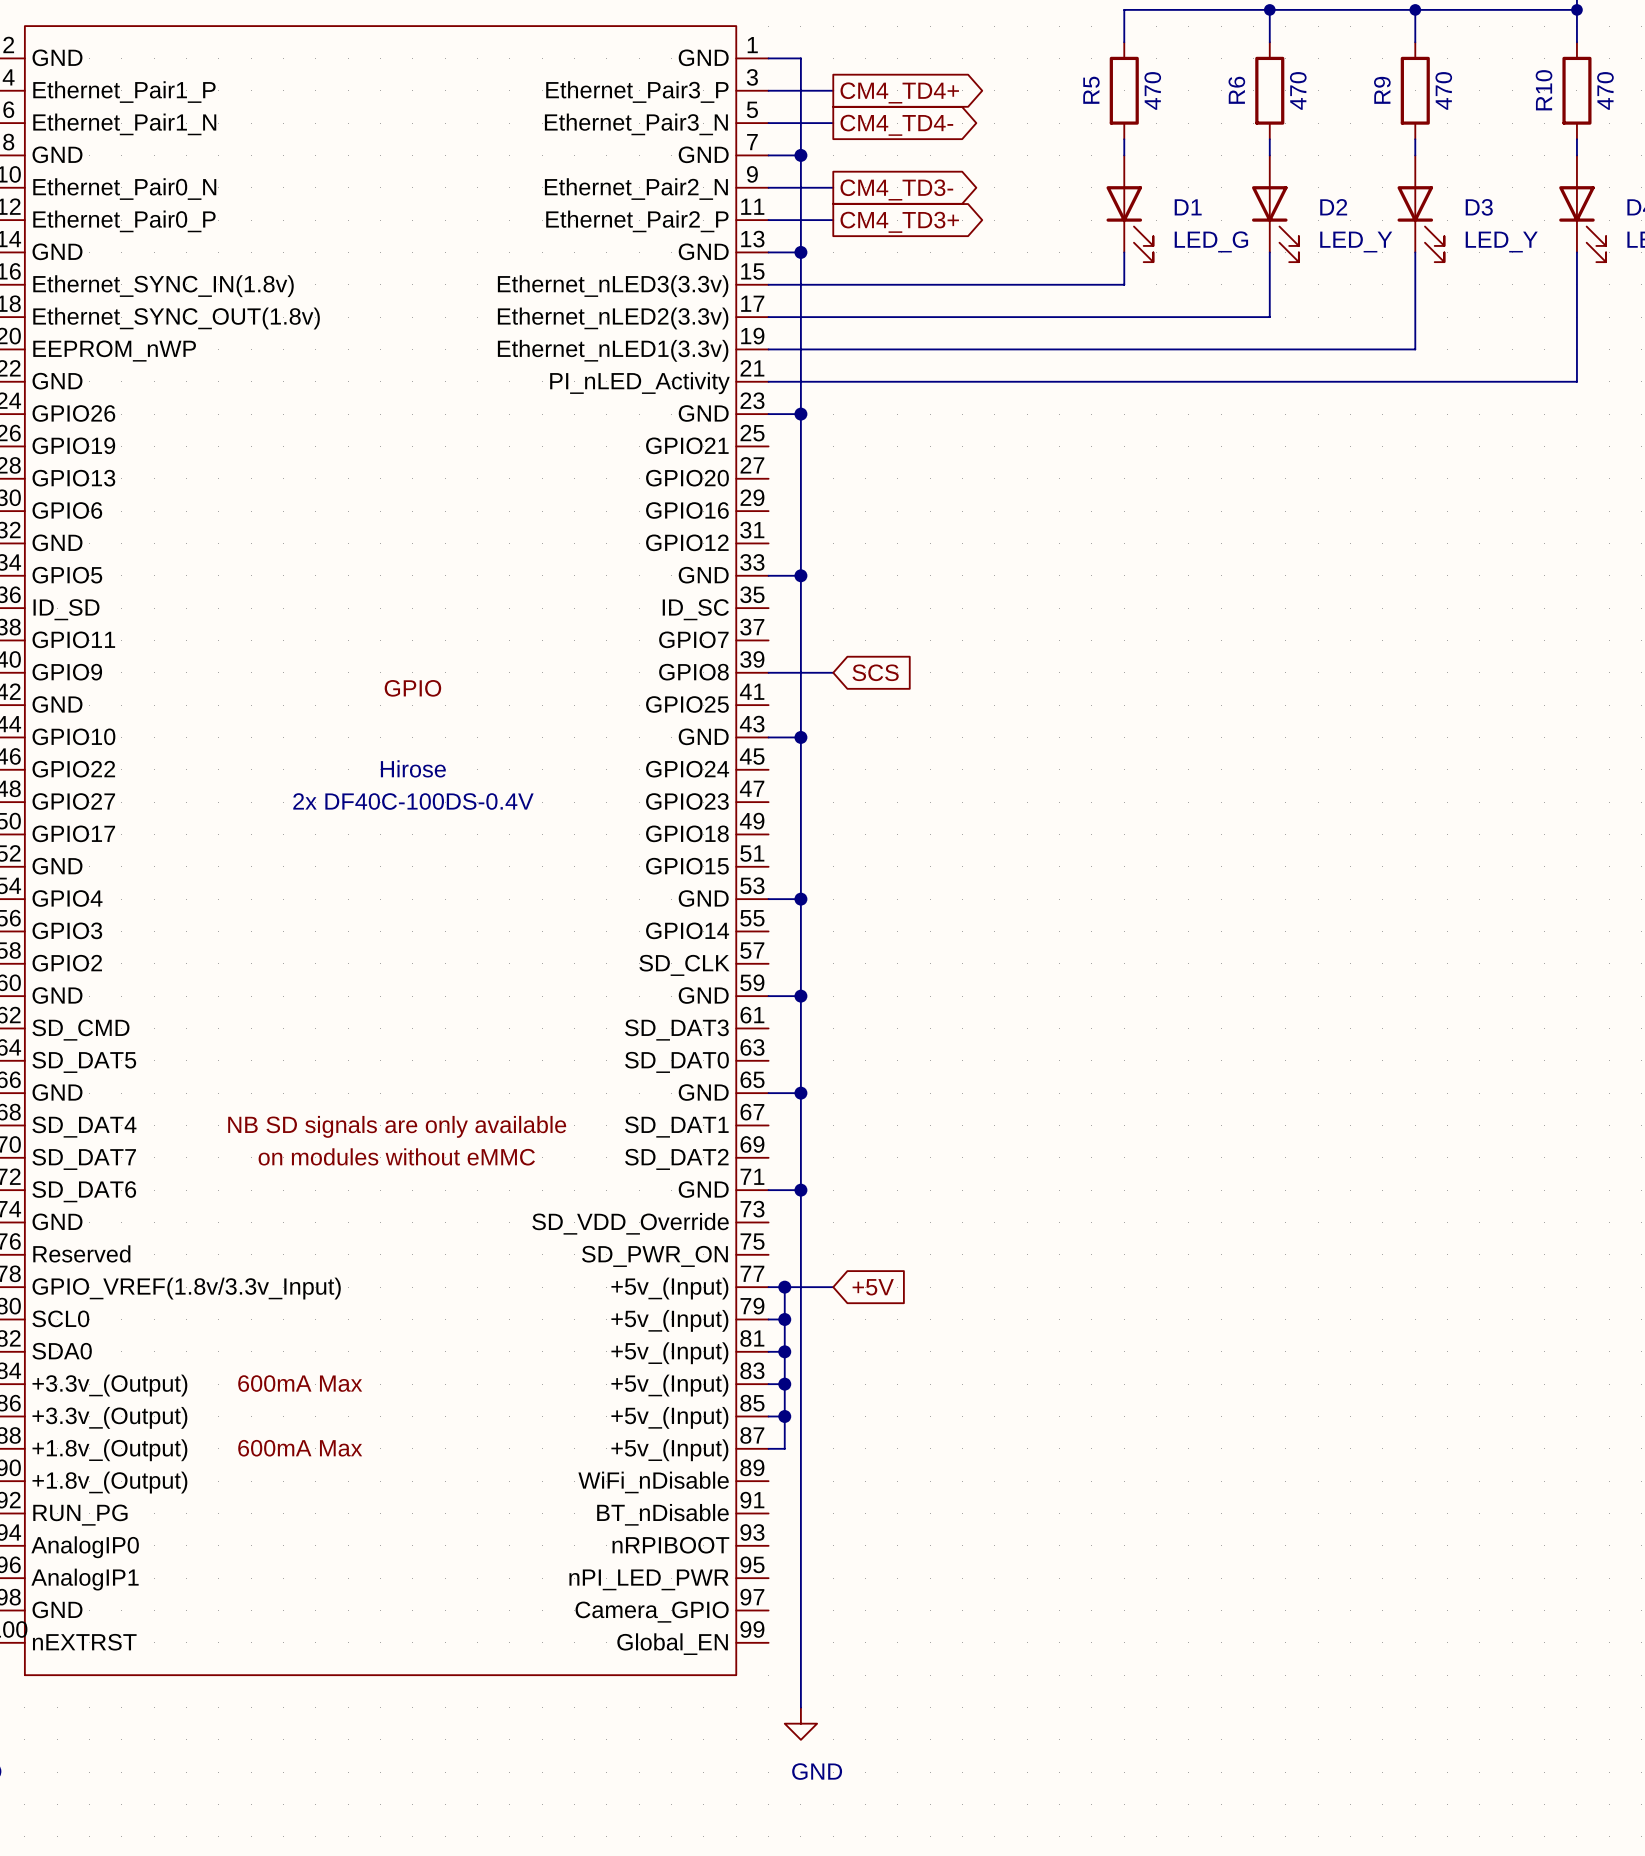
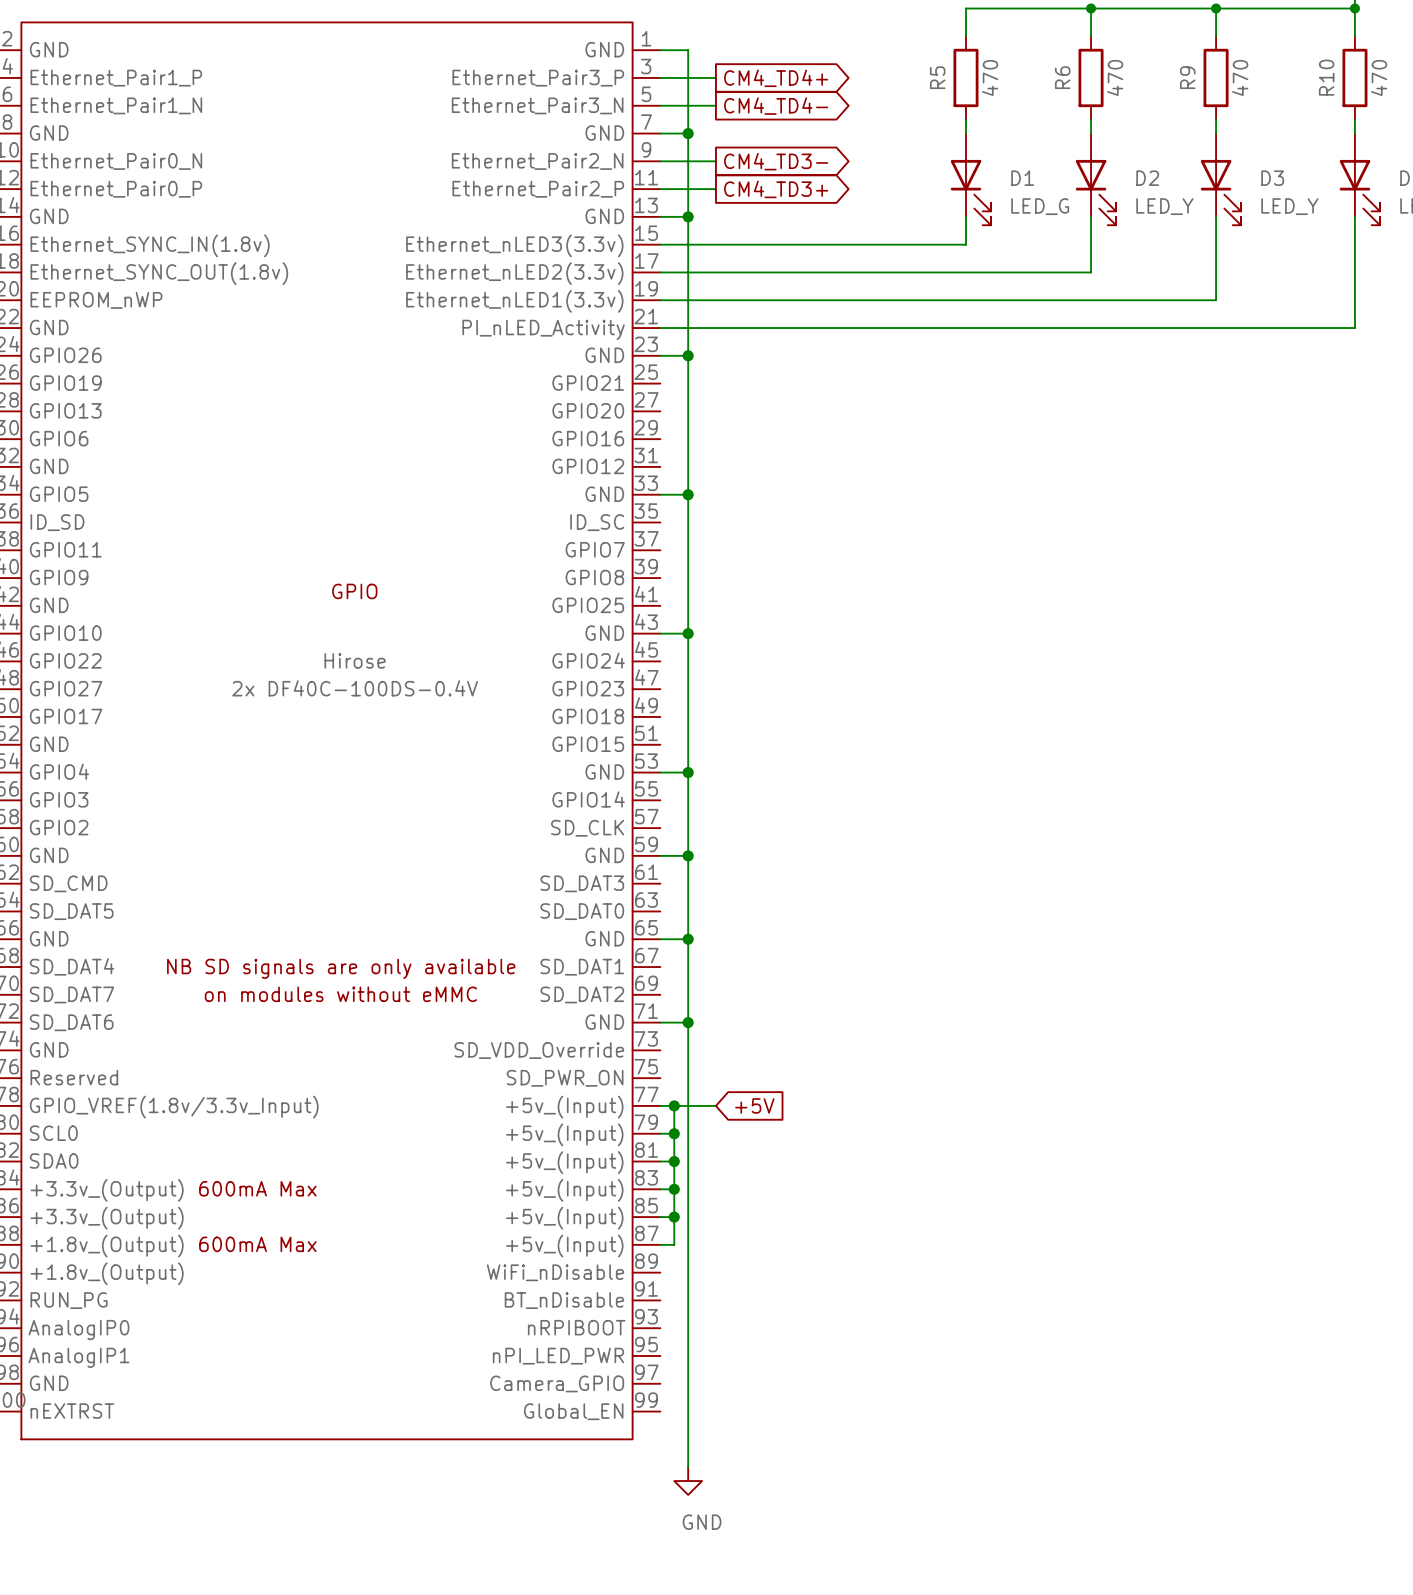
wire: (768, 672) (833, 672) -> none
global label: SCS (875, 672) -> none

